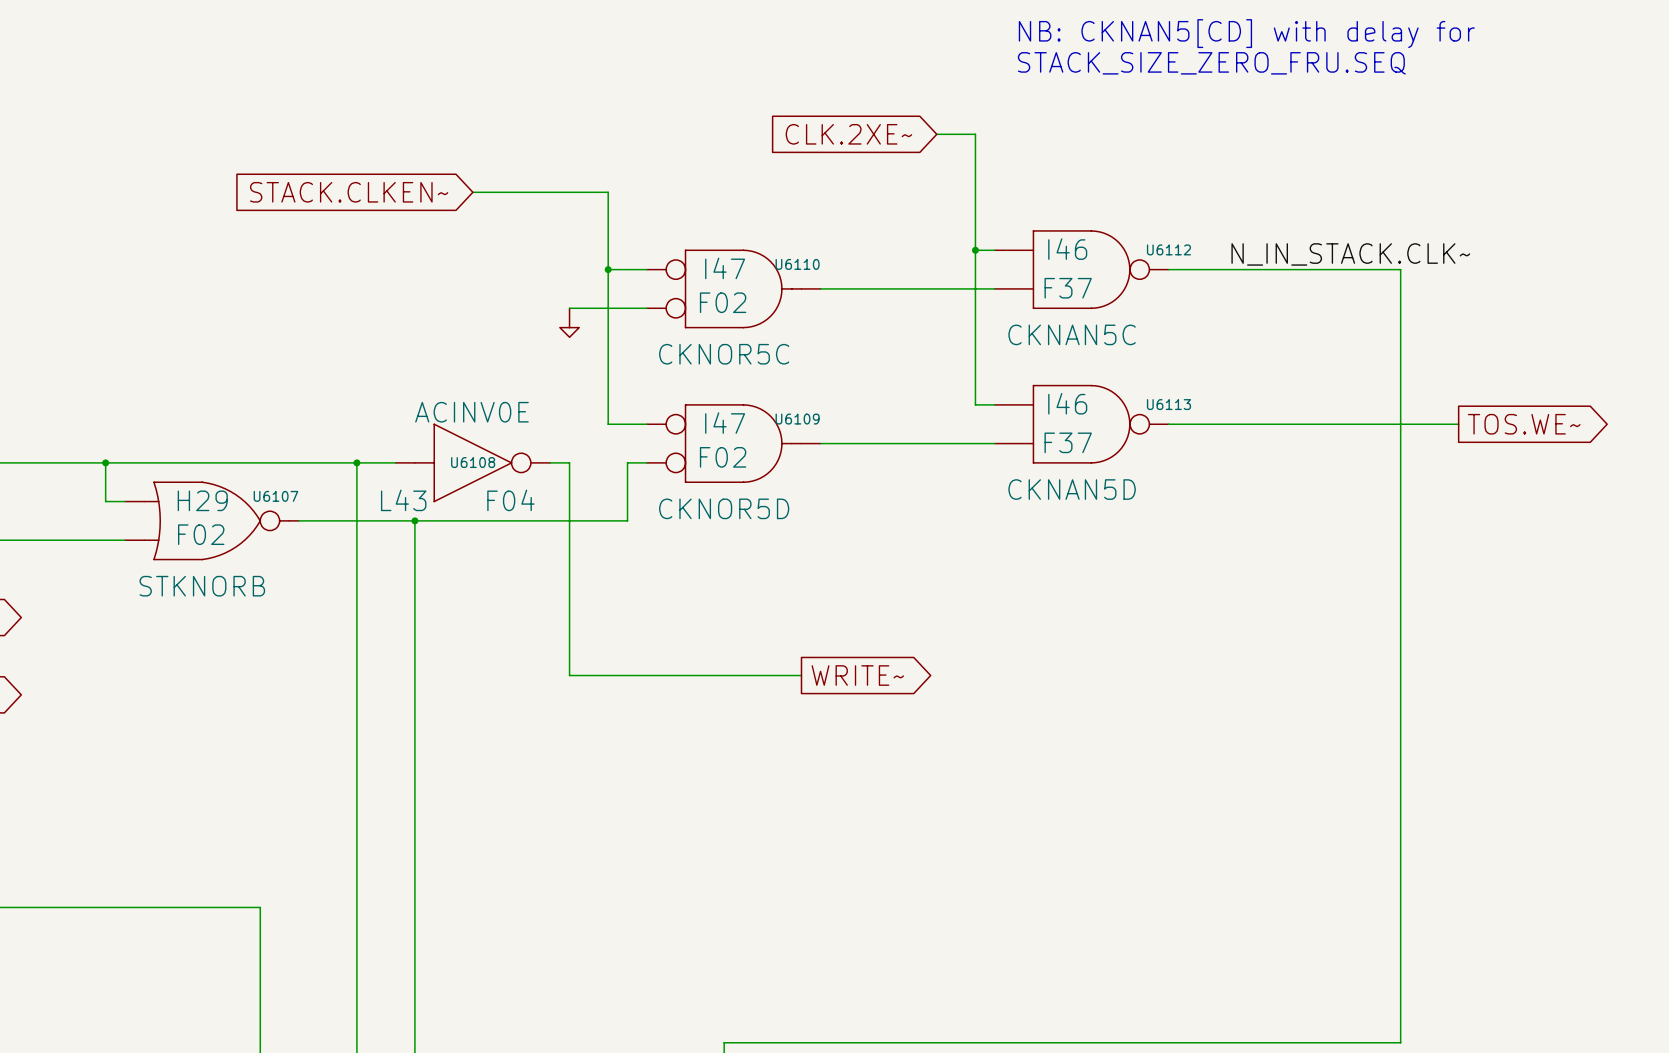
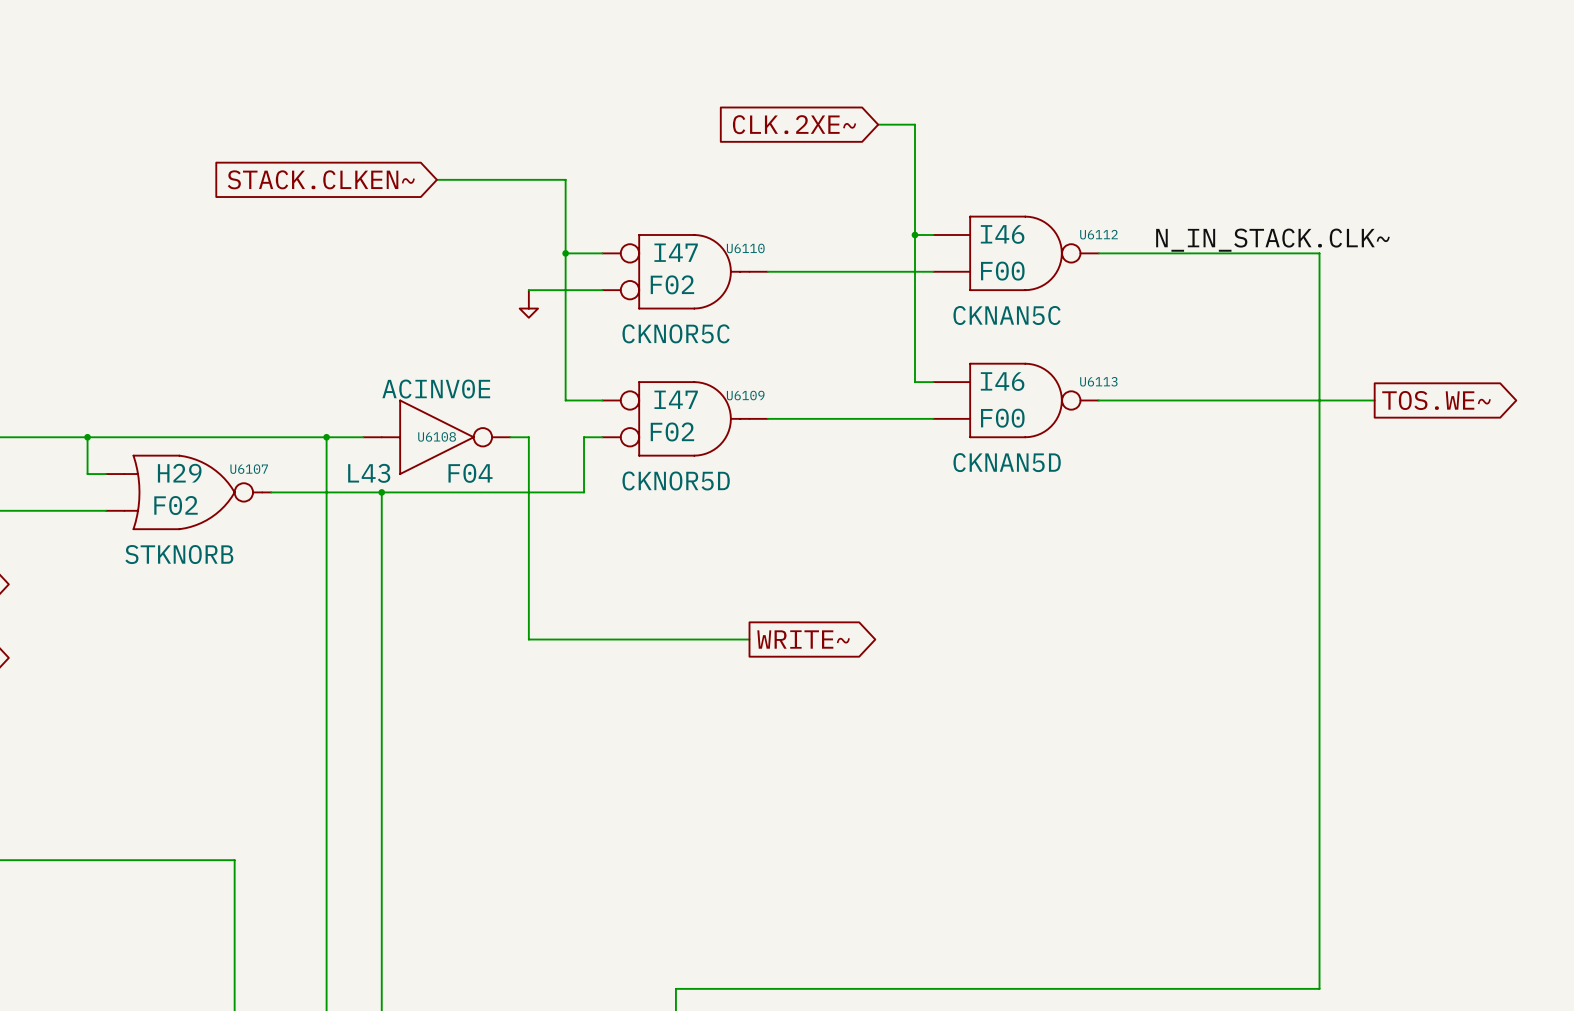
text: NB: CKNAN5[CD] with delay for (1246, 33) -> none
text: STACK_SIZE_ZERO_FRU.SEQ (1211, 63) -> none
U6112 value: F37 (1068, 288) -> F00 (1002, 271)
U6113 value: F37 (1068, 442) -> F00 (1002, 418)

